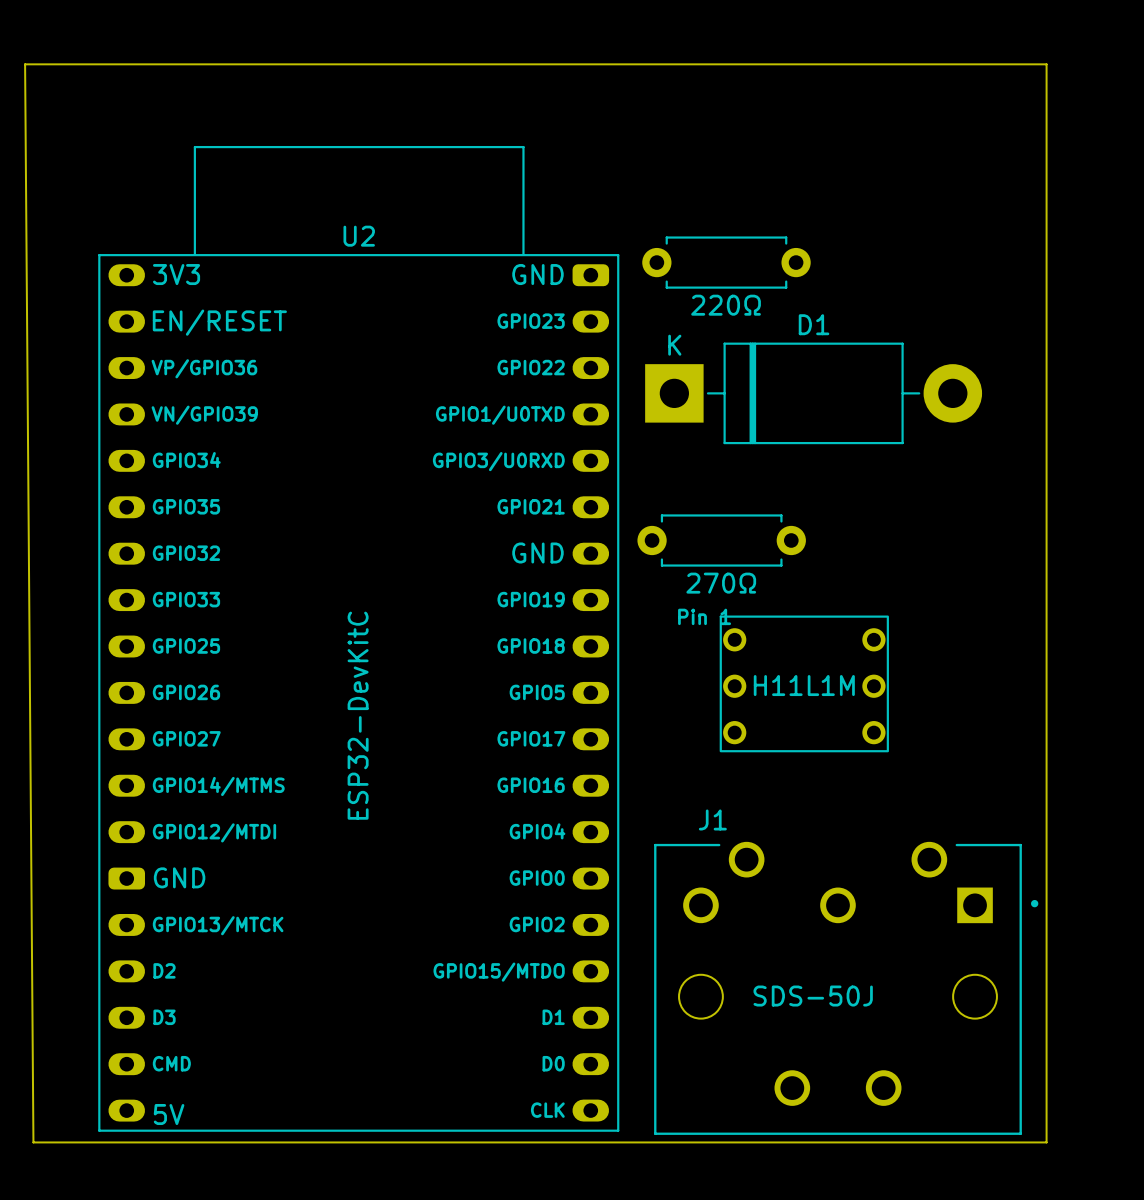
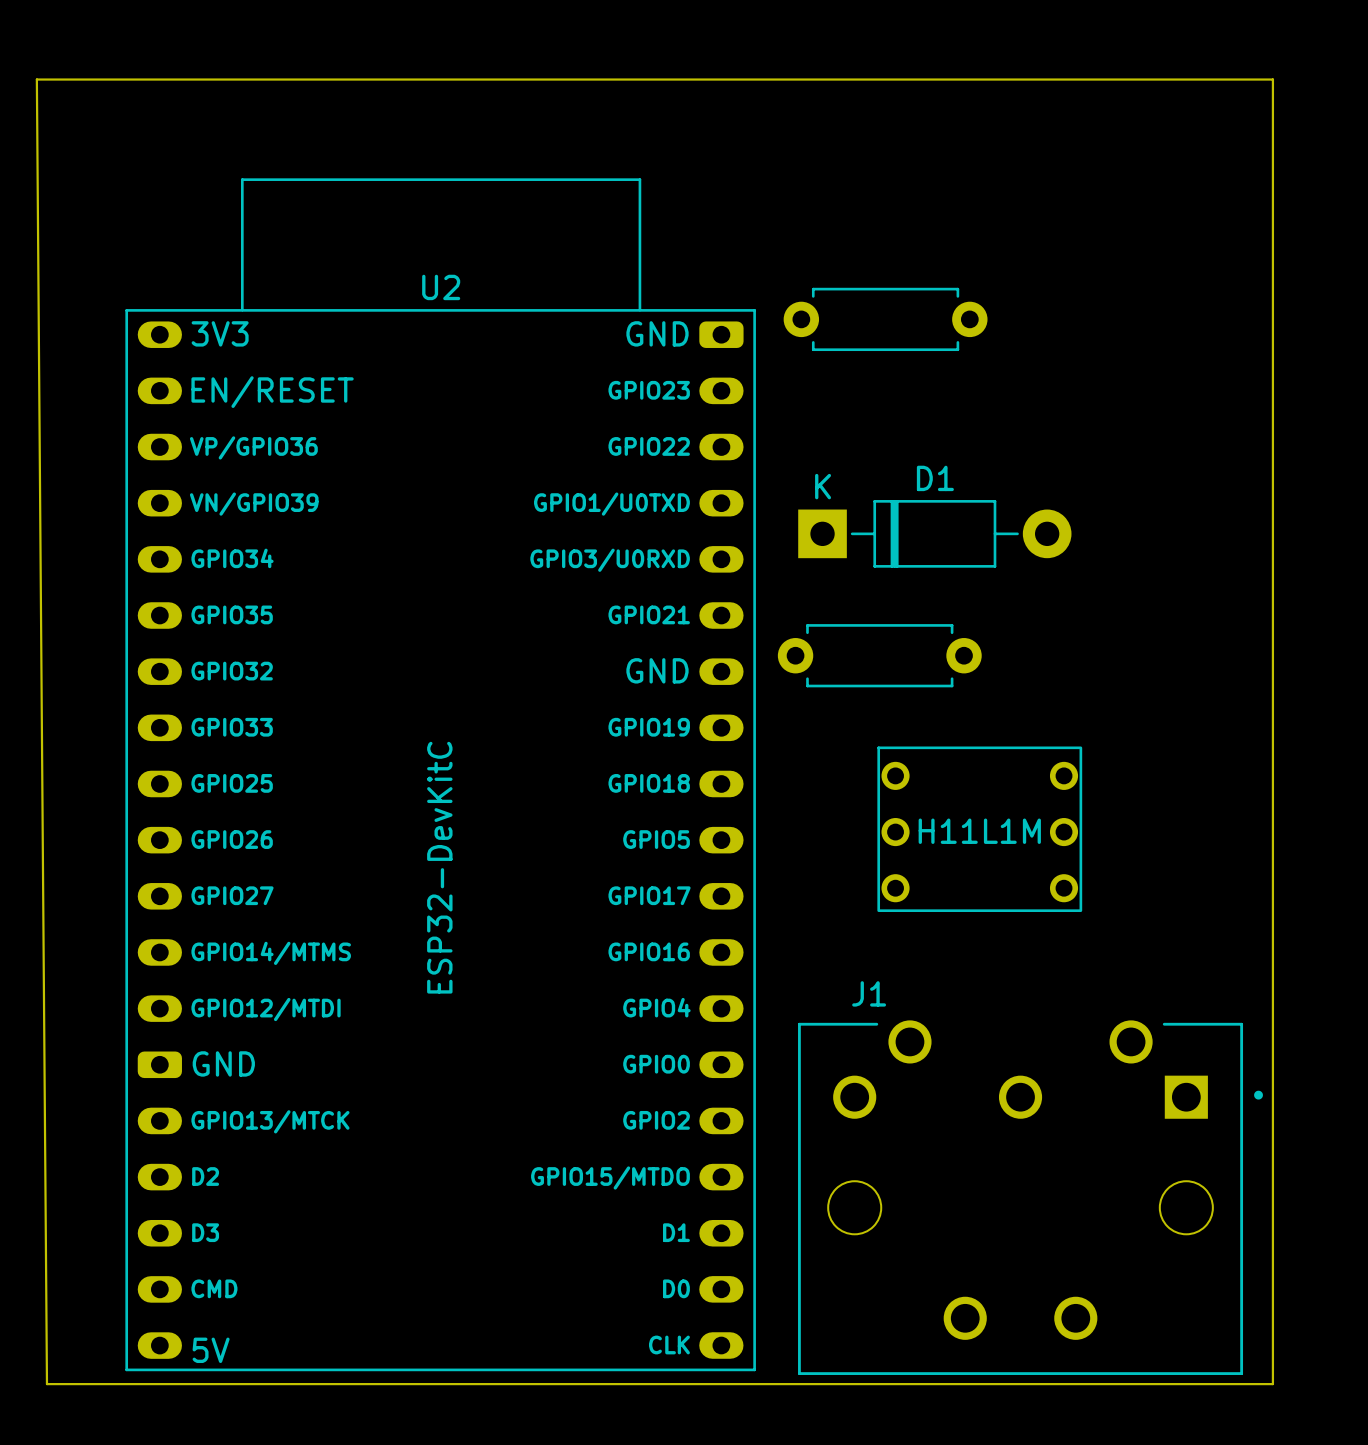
part value: 220Ω (726, 305) -> none
D1 footprint: [645, 342, 983, 445] -> [798, 500, 1072, 568]
part value: 270Ω (721, 583) -> none
text: Pin 1 (704, 616) -> none
J1 value: SDS-50J (813, 996) -> none

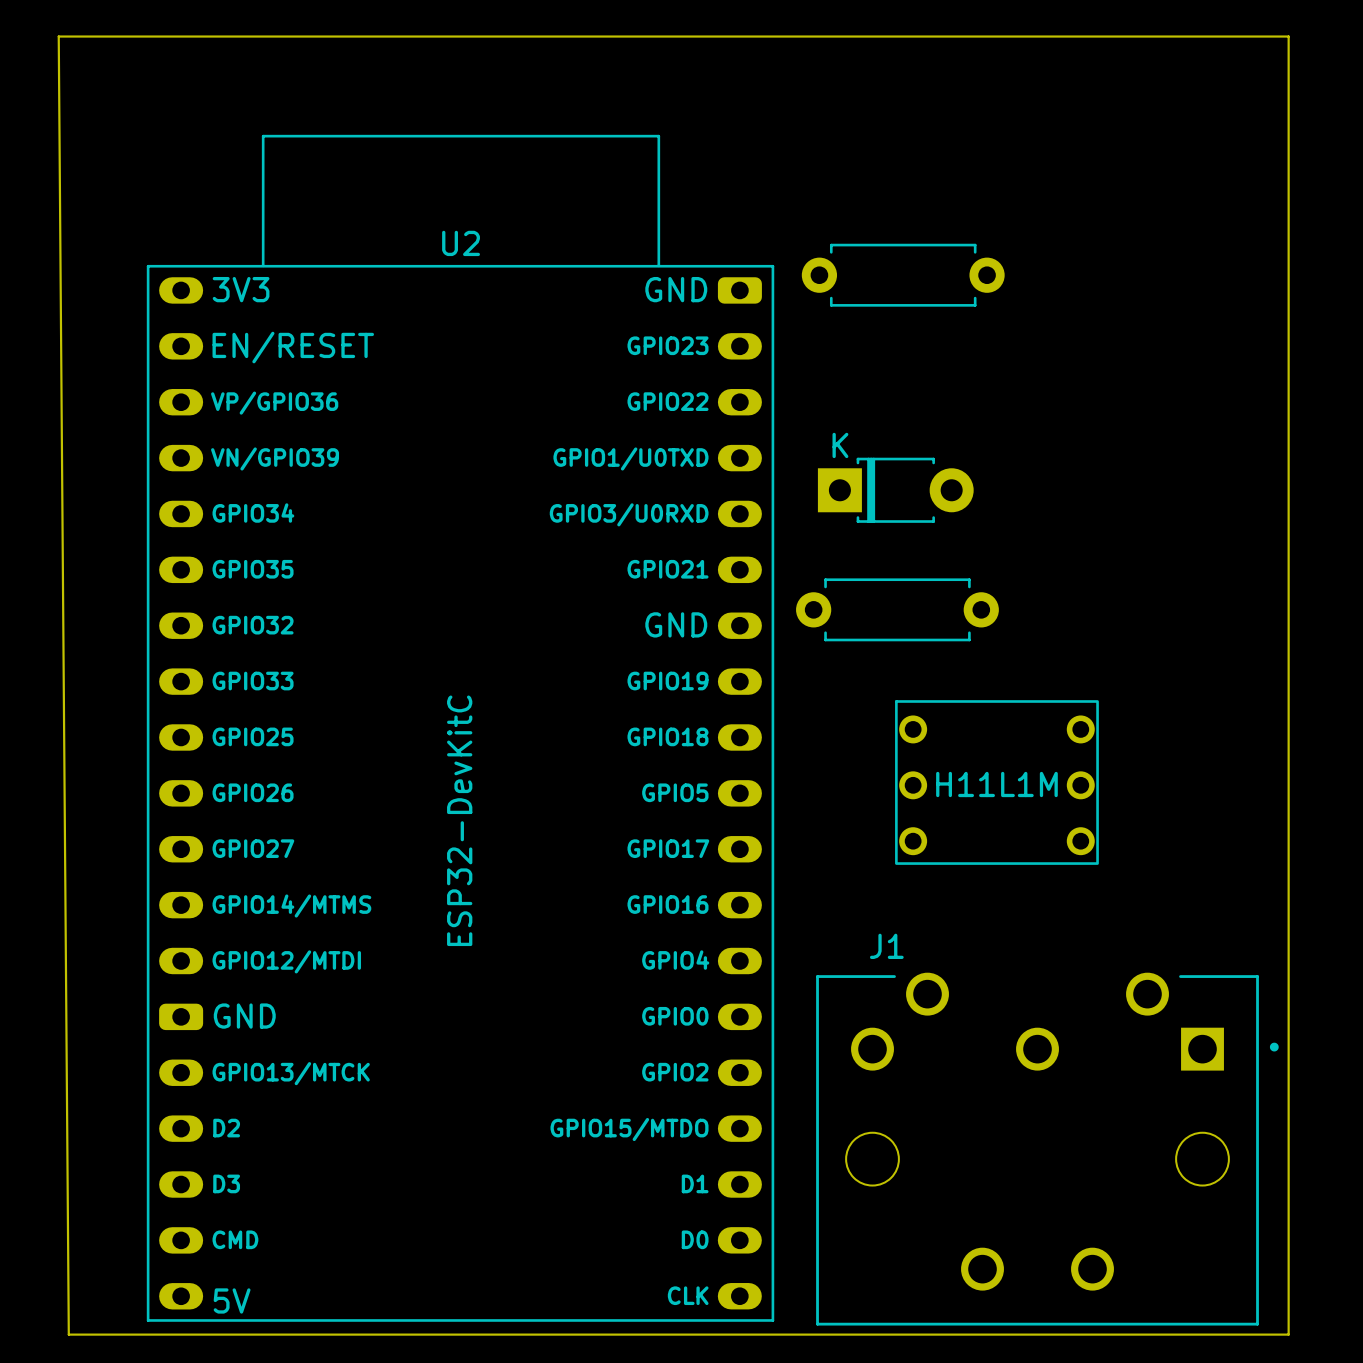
D1: (934, 533) -> none
part: none -> (895, 490)

